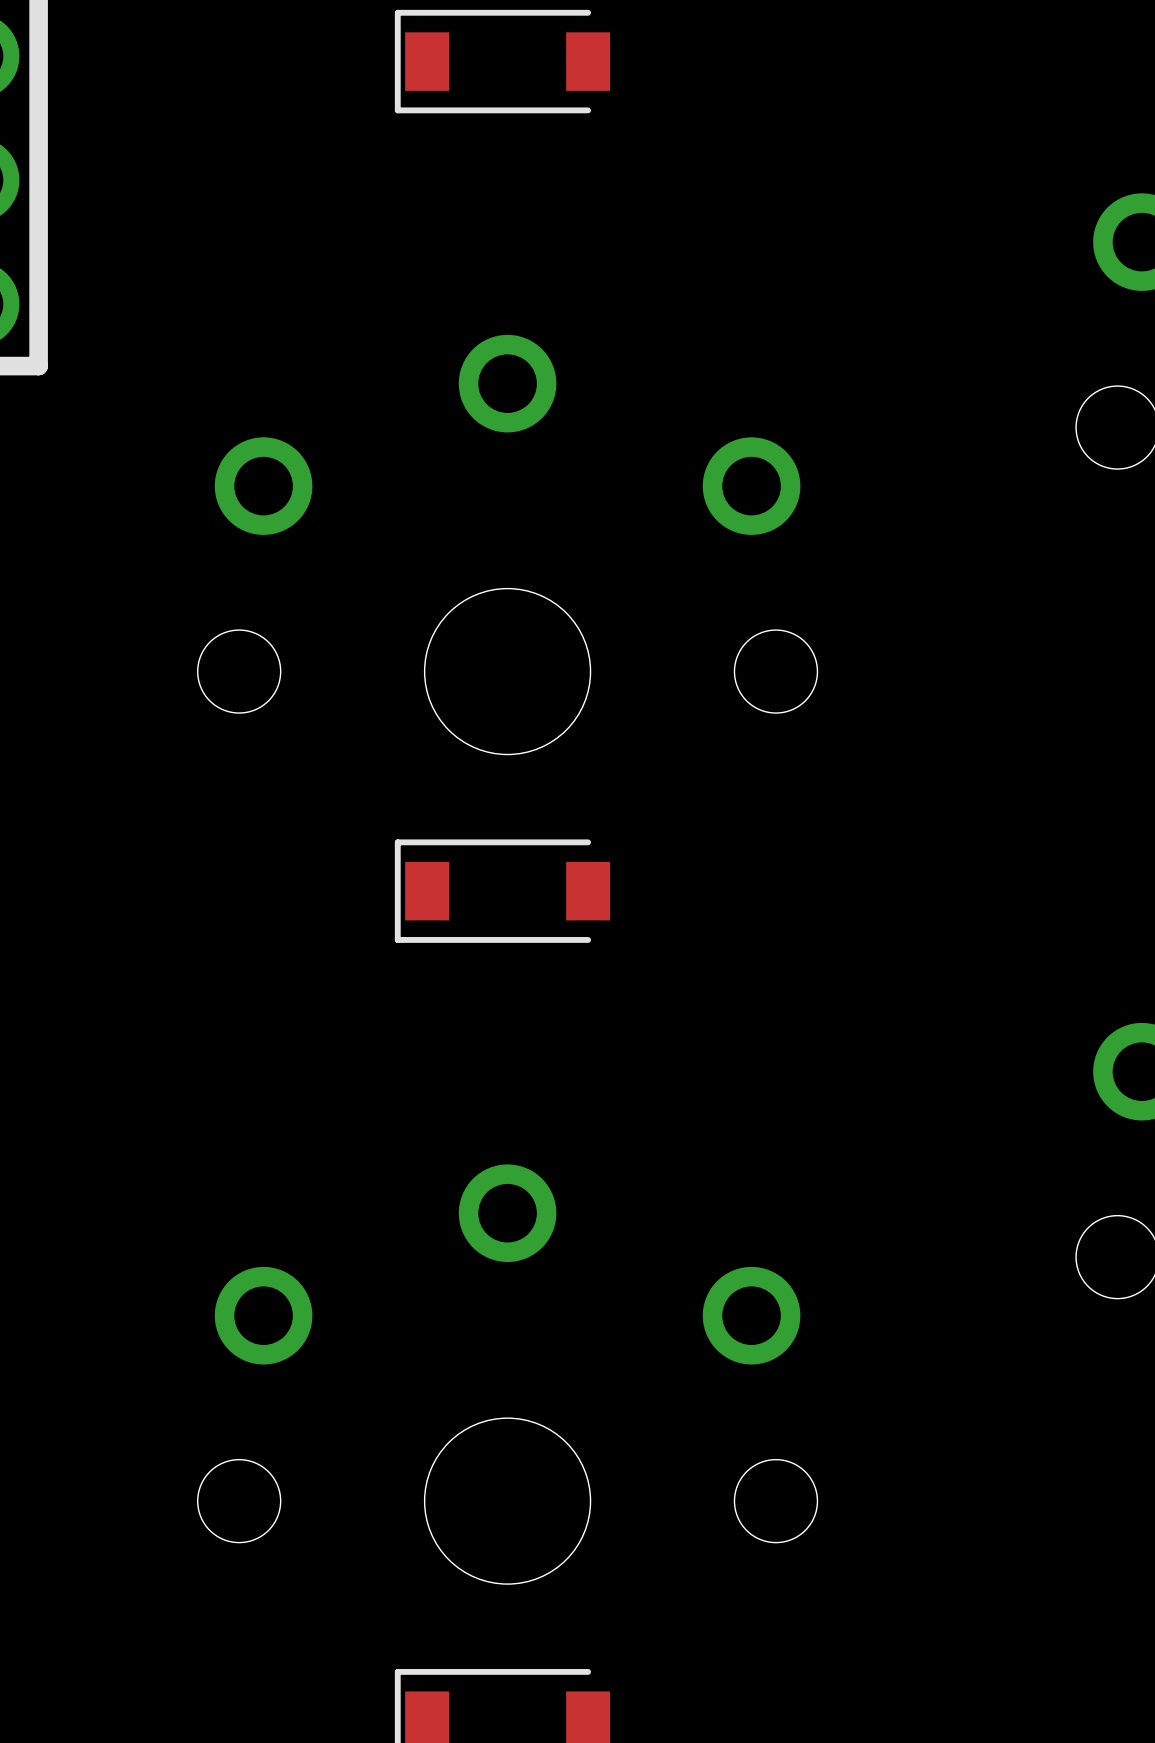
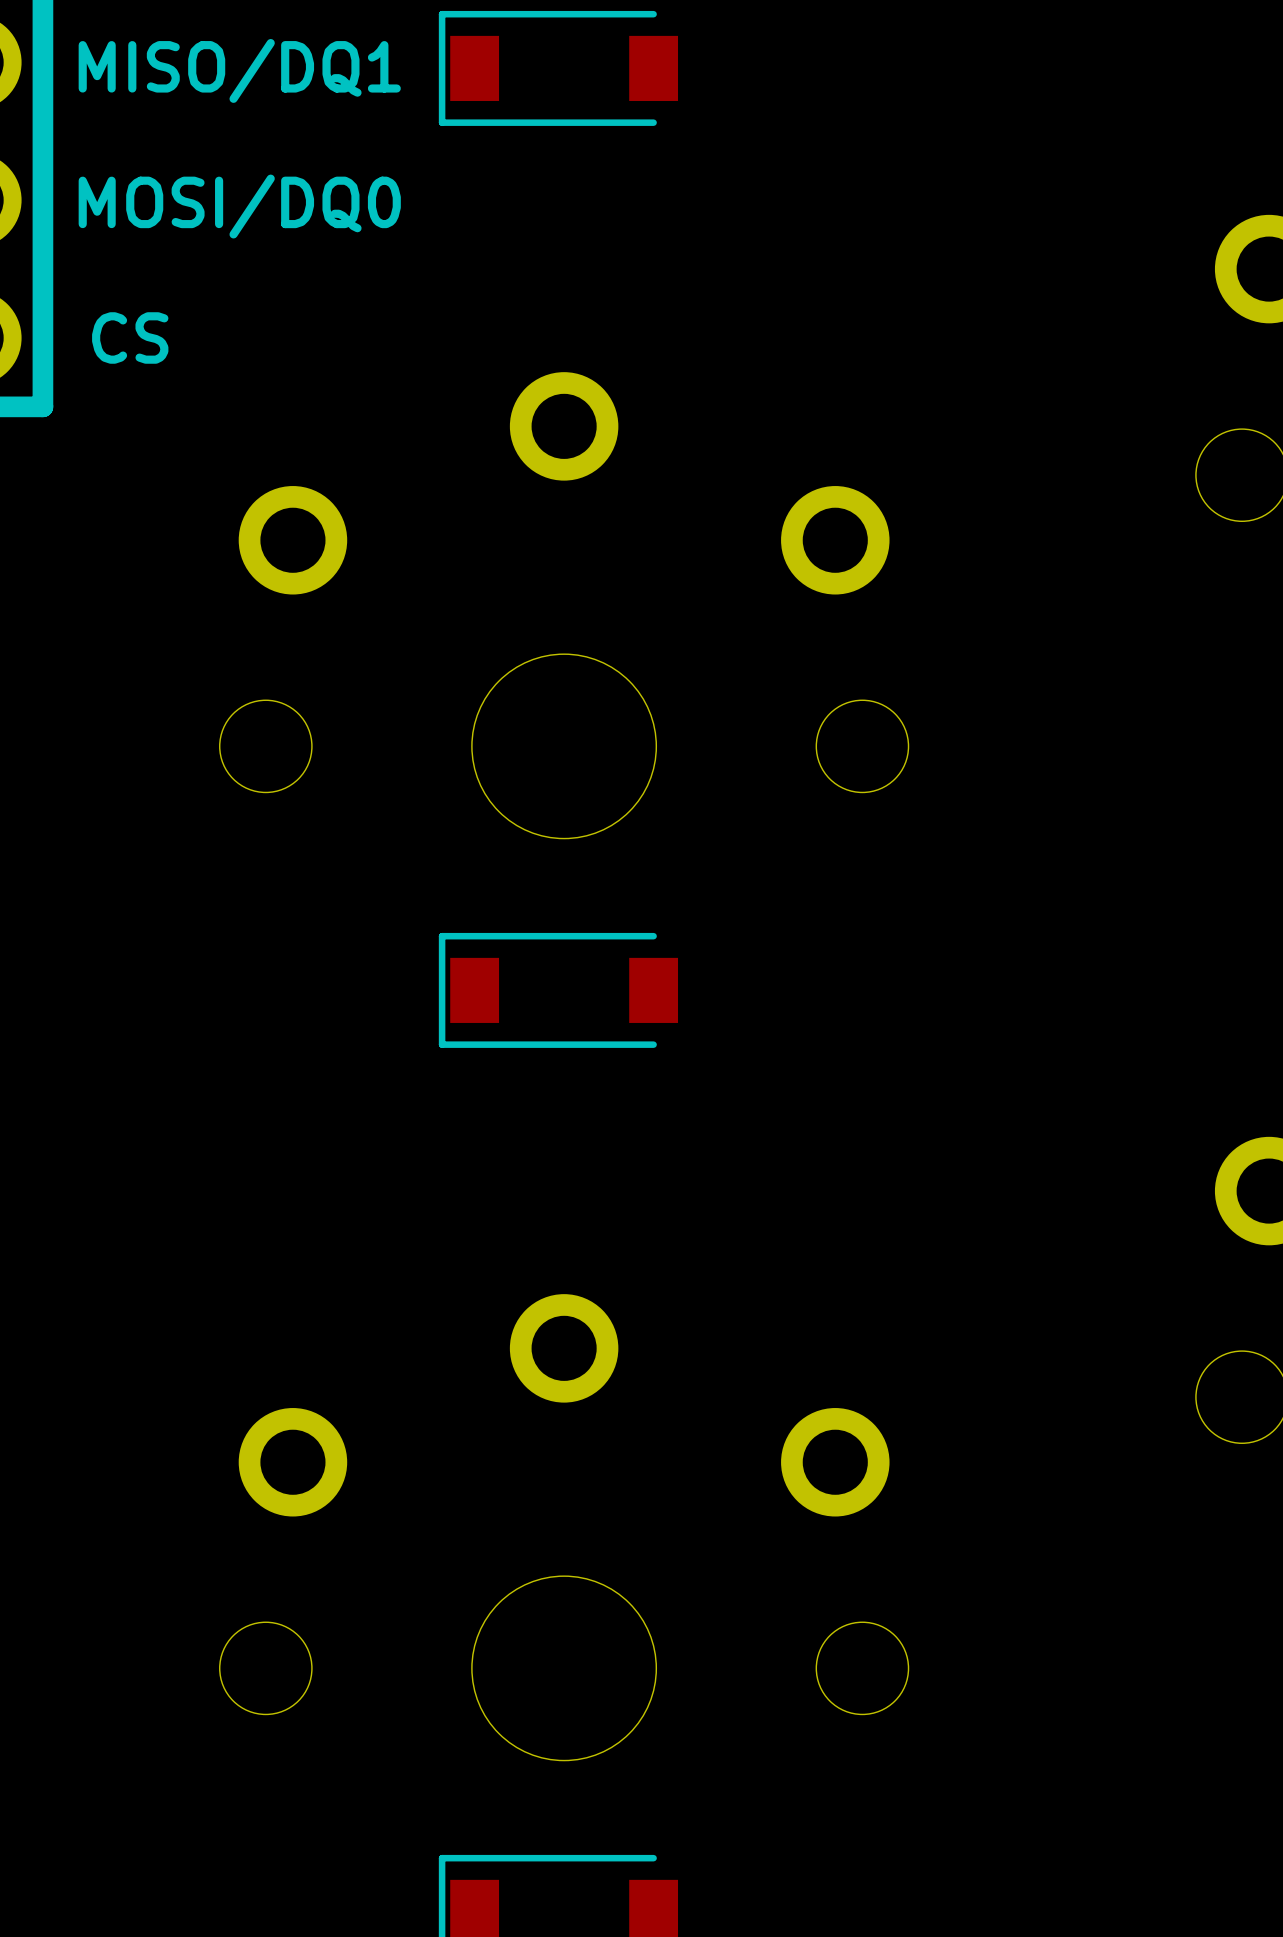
text: none -> MISO/DQ1 (239, 70)
text: none -> MOSI/DQ0 (239, 206)
text: none -> CS (130, 337)

